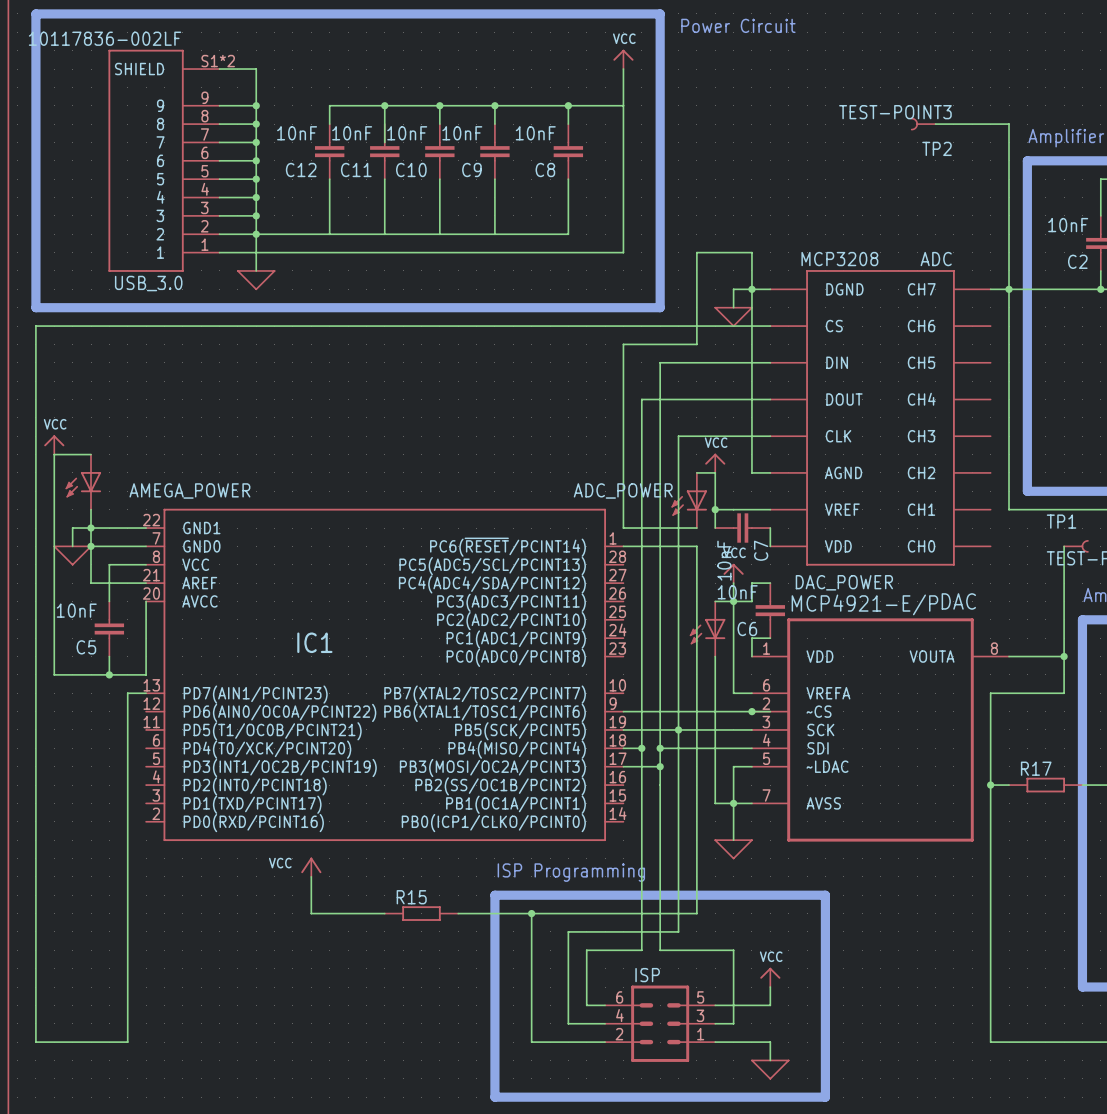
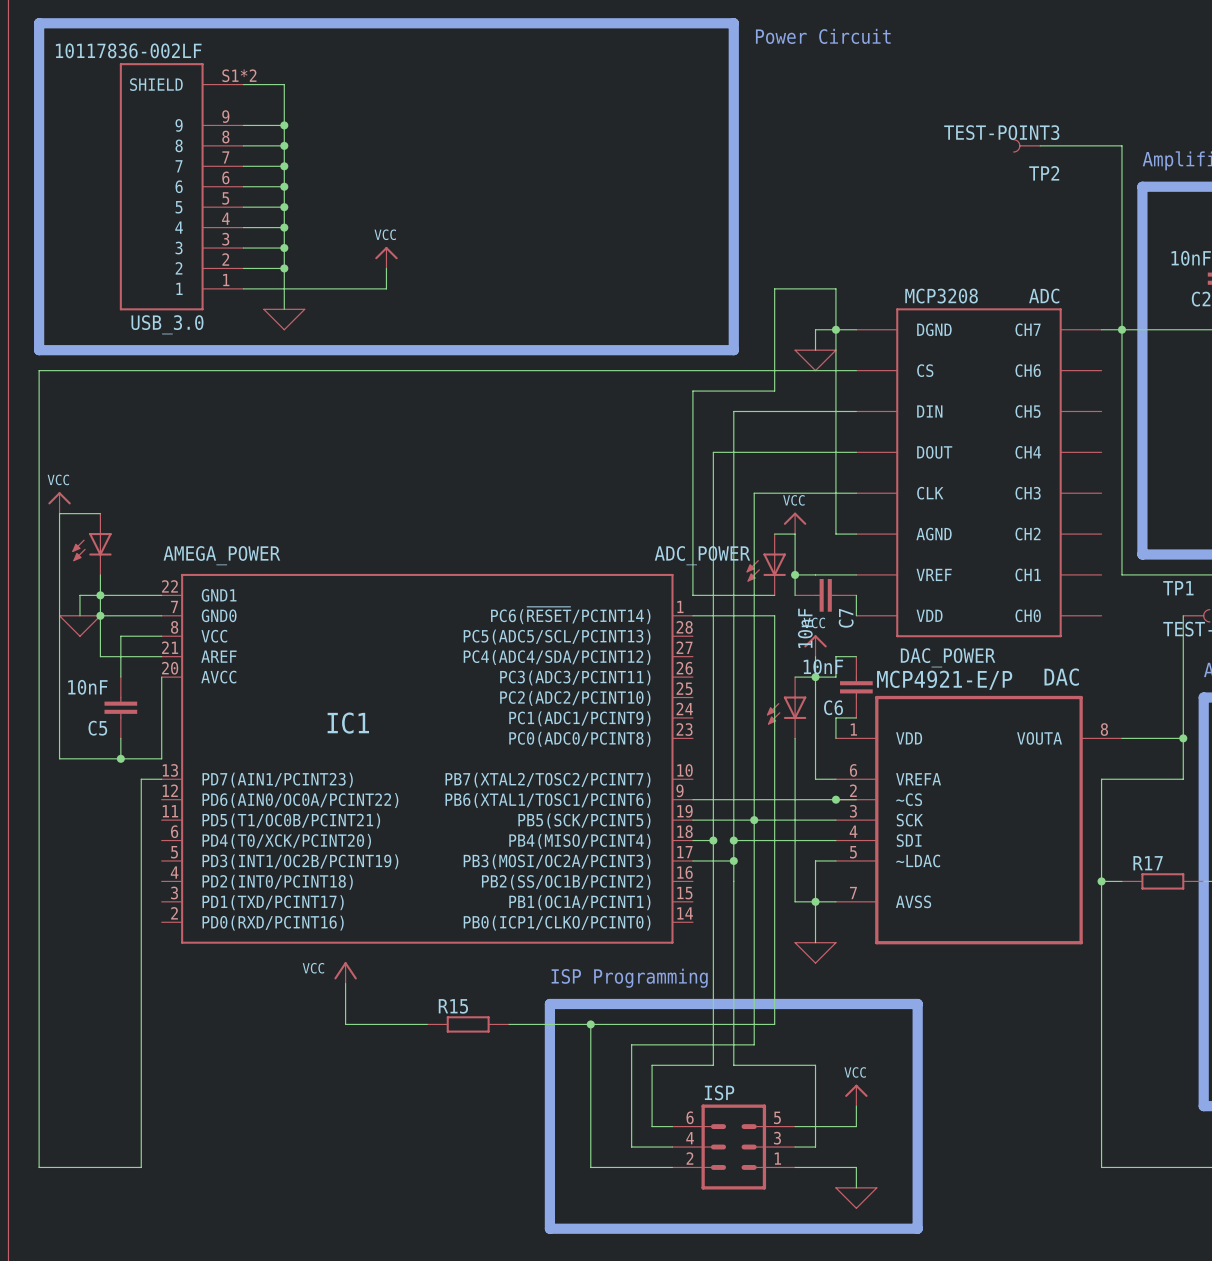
power symbol: VCC (623, 59) -> none
wire: (623, 69) (623, 252) (348, 252) -> (386, 268) (386, 288)
wire: (384, 105) (384, 142) -> none
junction: (384, 105) -> none
wire: (439, 105) (439, 124) -> none
junction: (439, 105) -> none
wire: (494, 105) (494, 124) -> none
junction: (494, 105) -> none
wire: (568, 105) (568, 124) -> none
junction: (568, 105) -> none
wire: (623, 105) (329, 105) (329, 124) -> none
C12: 10nF (329, 151) -> none
C11: 10nF (384, 151) -> none
C10: 10nF (439, 151) -> none
C9: 10nF (494, 151) -> none
C8: 10nF (568, 151) -> none
wire: (329, 179) (329, 234) -> none
wire: (384, 179) (384, 234) -> none
wire: (439, 179) (439, 234) -> none
wire: (494, 179) (494, 234) -> none
wire: (568, 179) (568, 234) (256, 234) -> none
power symbol: none -> VCC (386, 257)

